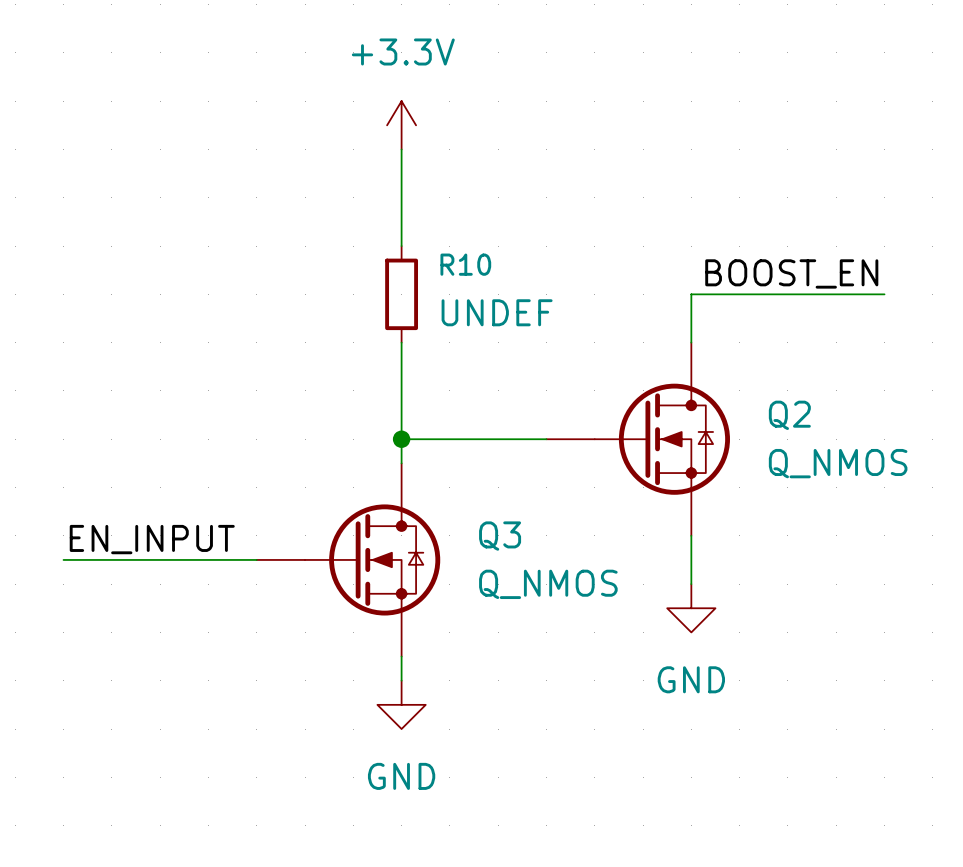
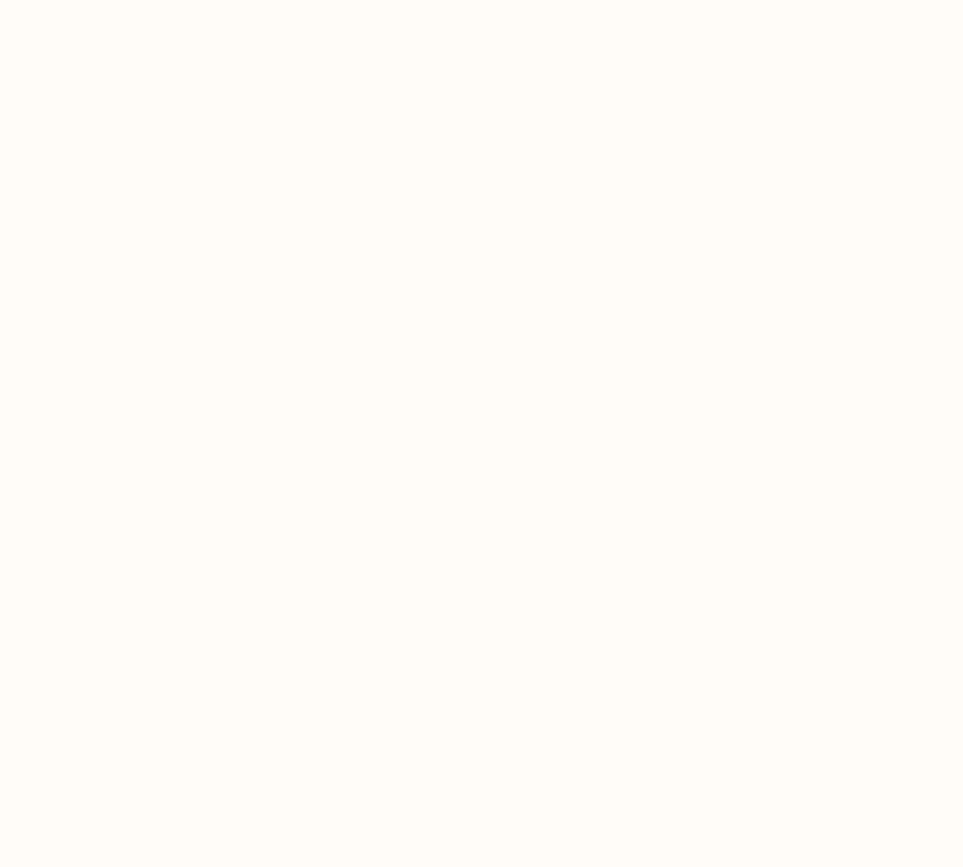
power symbol: +3.3V (401, 125) -> none
wire: (401, 149) (401, 246) -> none
label: BOOST_EN (791, 273) -> none
R10: UNDEF (401, 294) -> none
wire: (884, 294) (691, 294) (691, 342) -> none
wire: (401, 342) (401, 463) -> none
wire: (401, 439) (546, 439) -> none
junction: (401, 439) -> none
Q2: Q_NMOS (638, 439) -> none
wire: (691, 535) (691, 584) -> none
label: EN_INPUT (152, 539) -> none
wire: (63, 559) (256, 559) -> none
Q3: Q_NMOS (348, 559) -> none
power symbol: GND (691, 608) -> none
wire: (401, 656) (401, 680) -> none
power symbol: GND (401, 704) -> none

